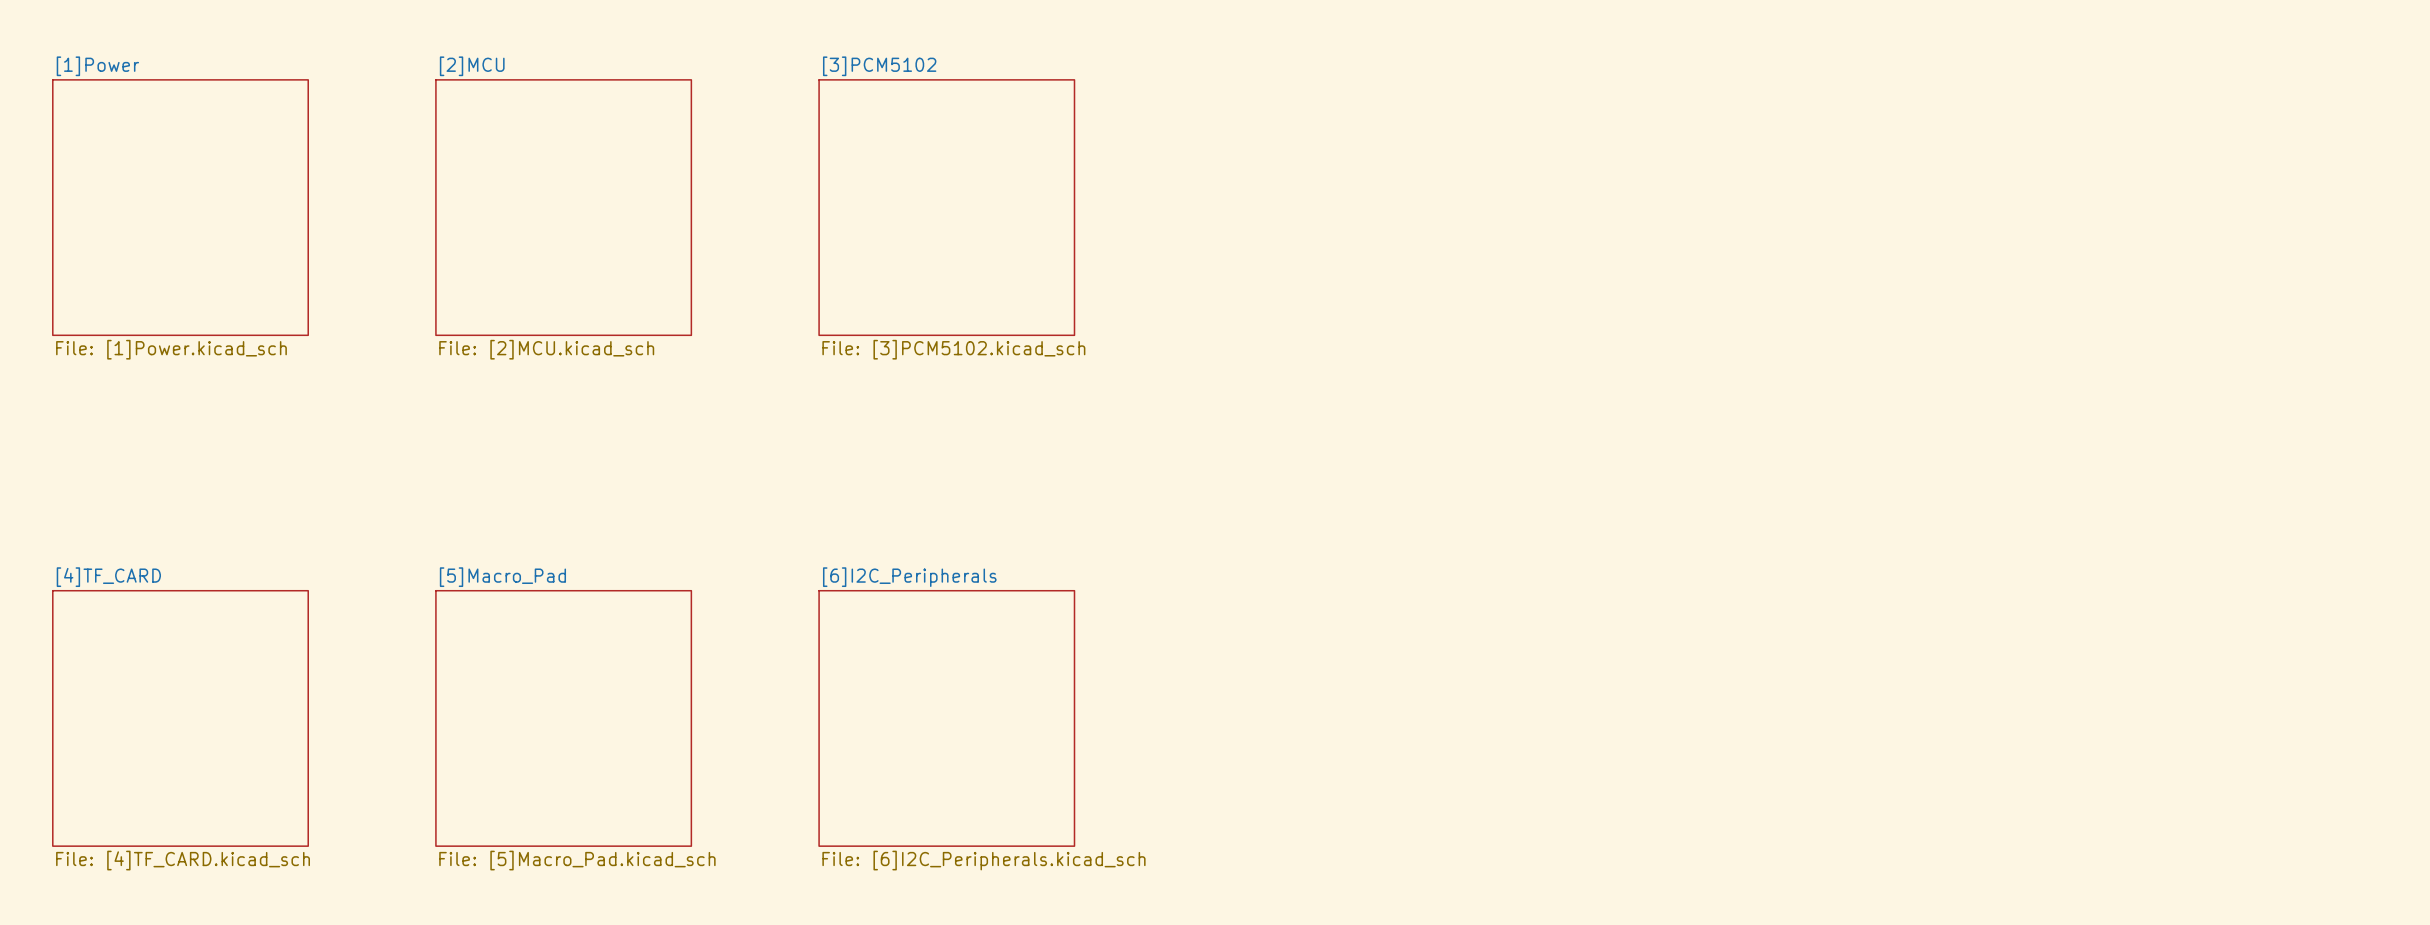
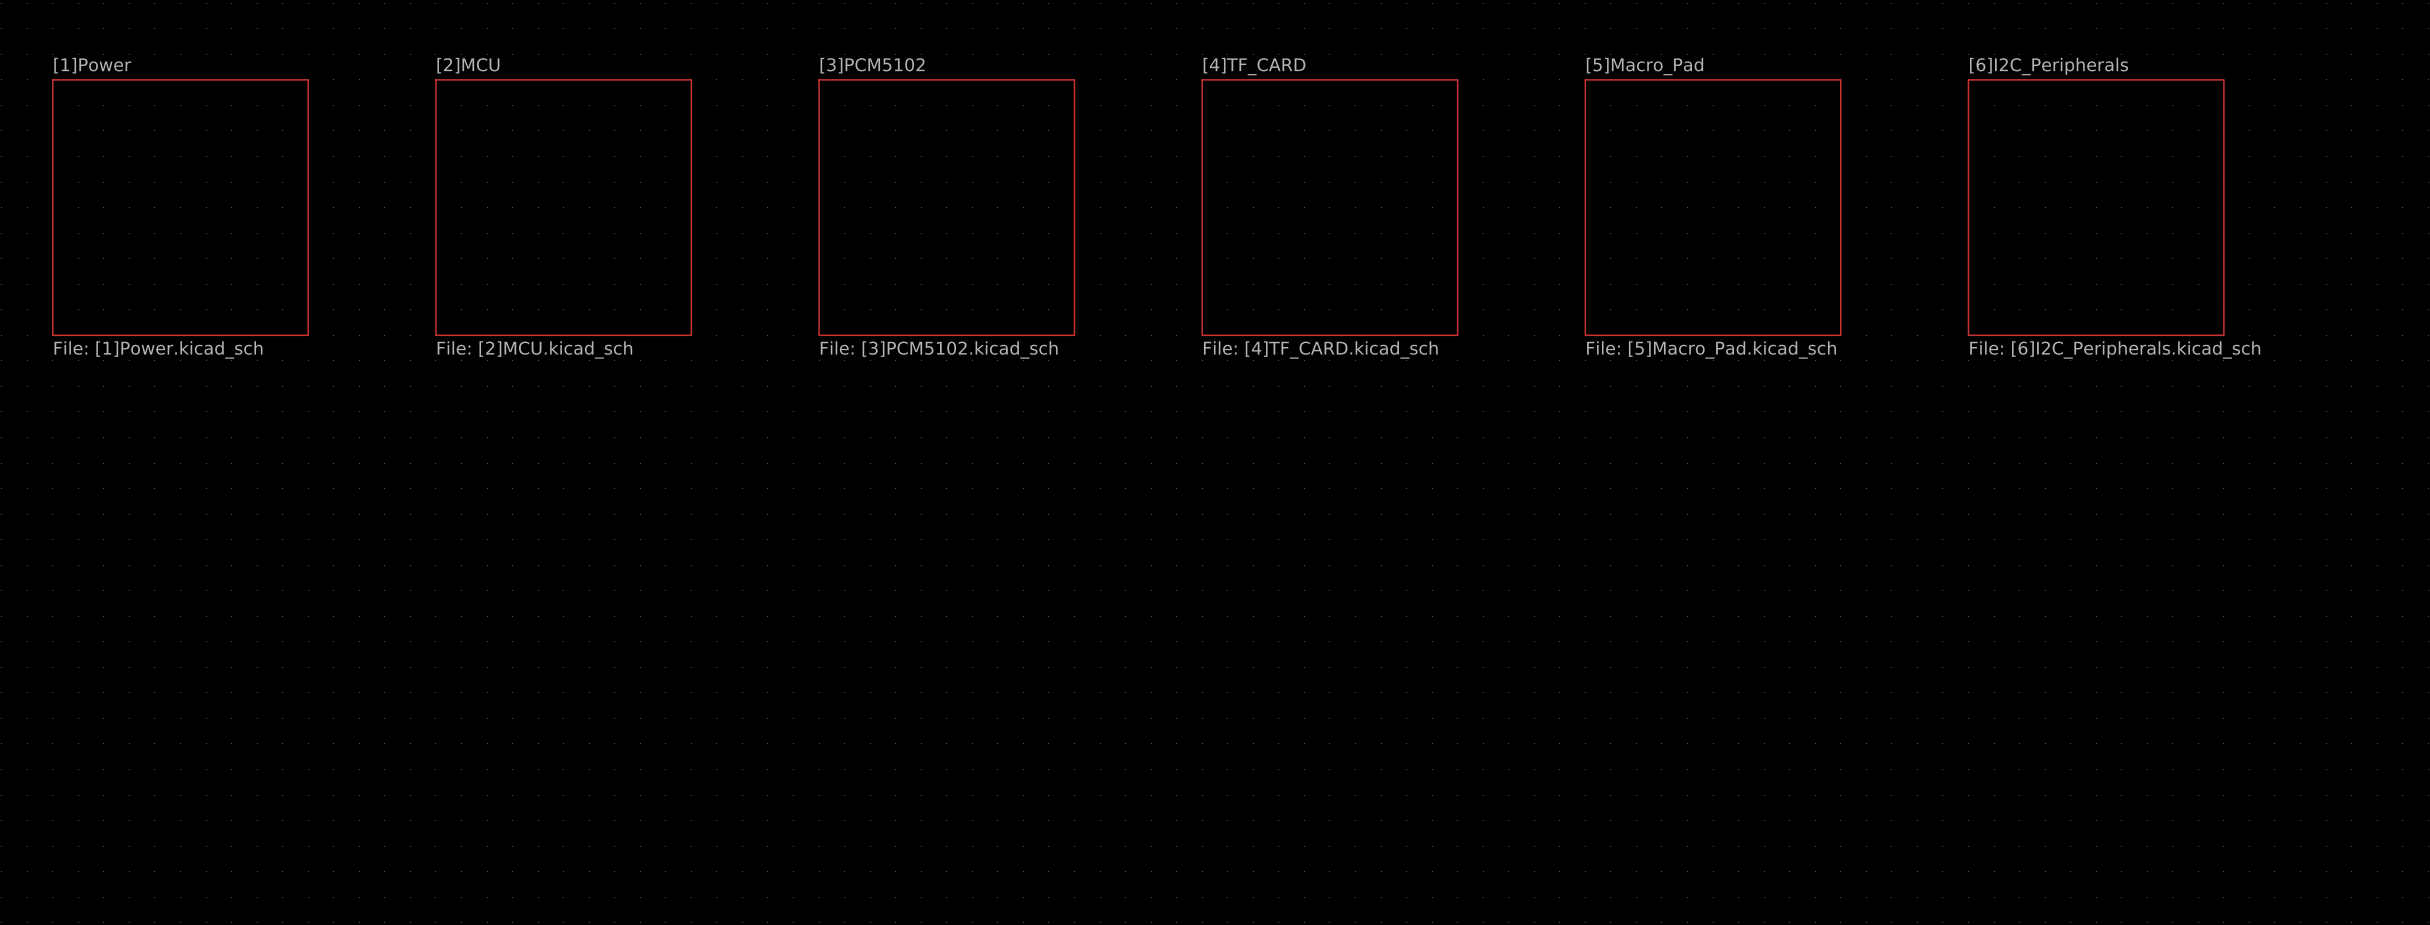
sheet [4]TF_CARD position: (180, 718) -> (1329, 207)
sheet [5]Macro_Pad position: (563, 718) -> (1713, 207)
sheet [6]I2C_Peripherals position: (946, 718) -> (2096, 207)

